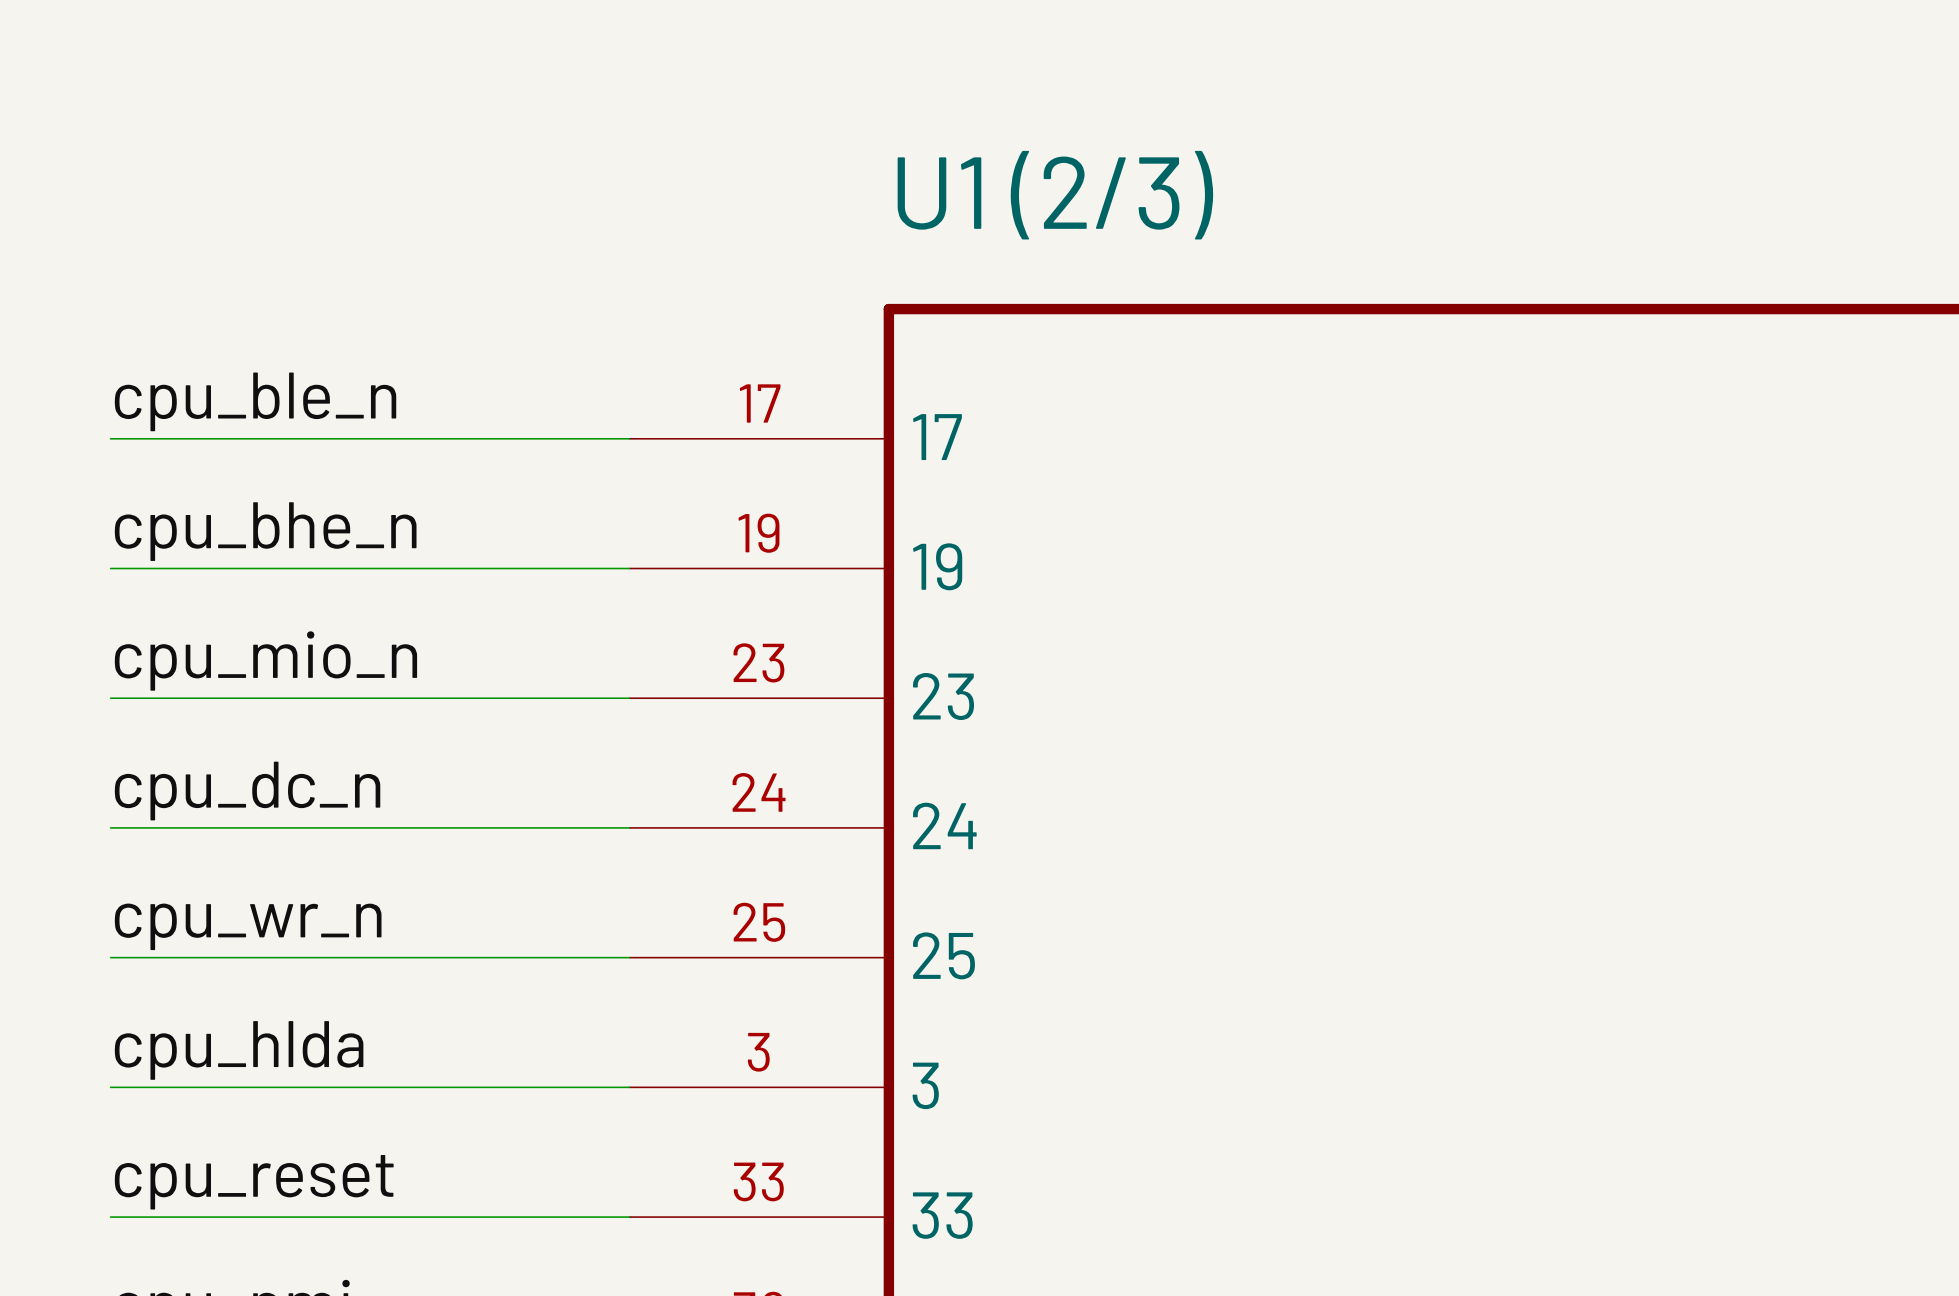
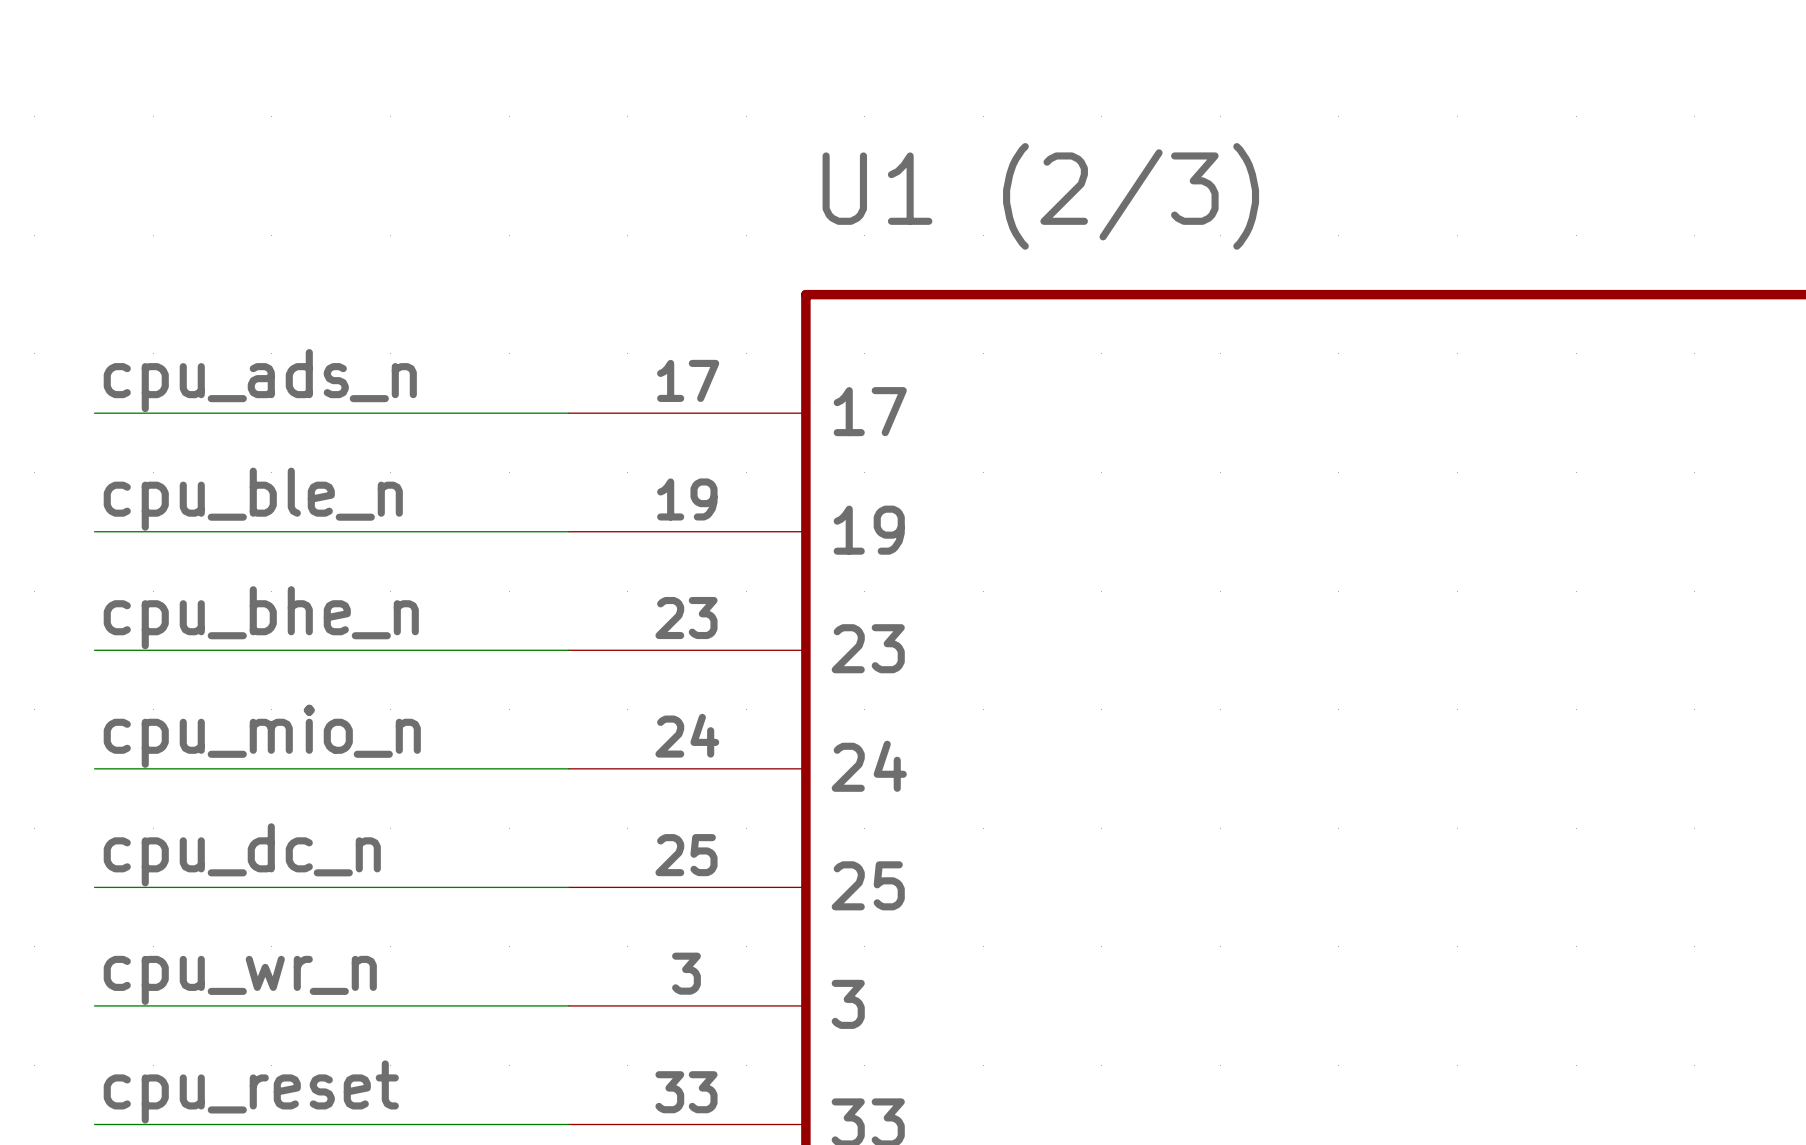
label: cpu_ble_n (255, 401) -> cpu_ads_n (260, 380)
label: cpu_bhe_n (265, 531) -> cpu_ble_n (253, 499)
label: cpu_mio_n (265, 660) -> cpu_bhe_n (261, 617)
label: cpu_dc_n (247, 791) -> cpu_mio_n (262, 736)
label: cpu_wr_n (248, 926) -> cpu_dc_n (242, 854)
label: cpu_hlda (239, 1050) -> cpu_wr_n (240, 980)

